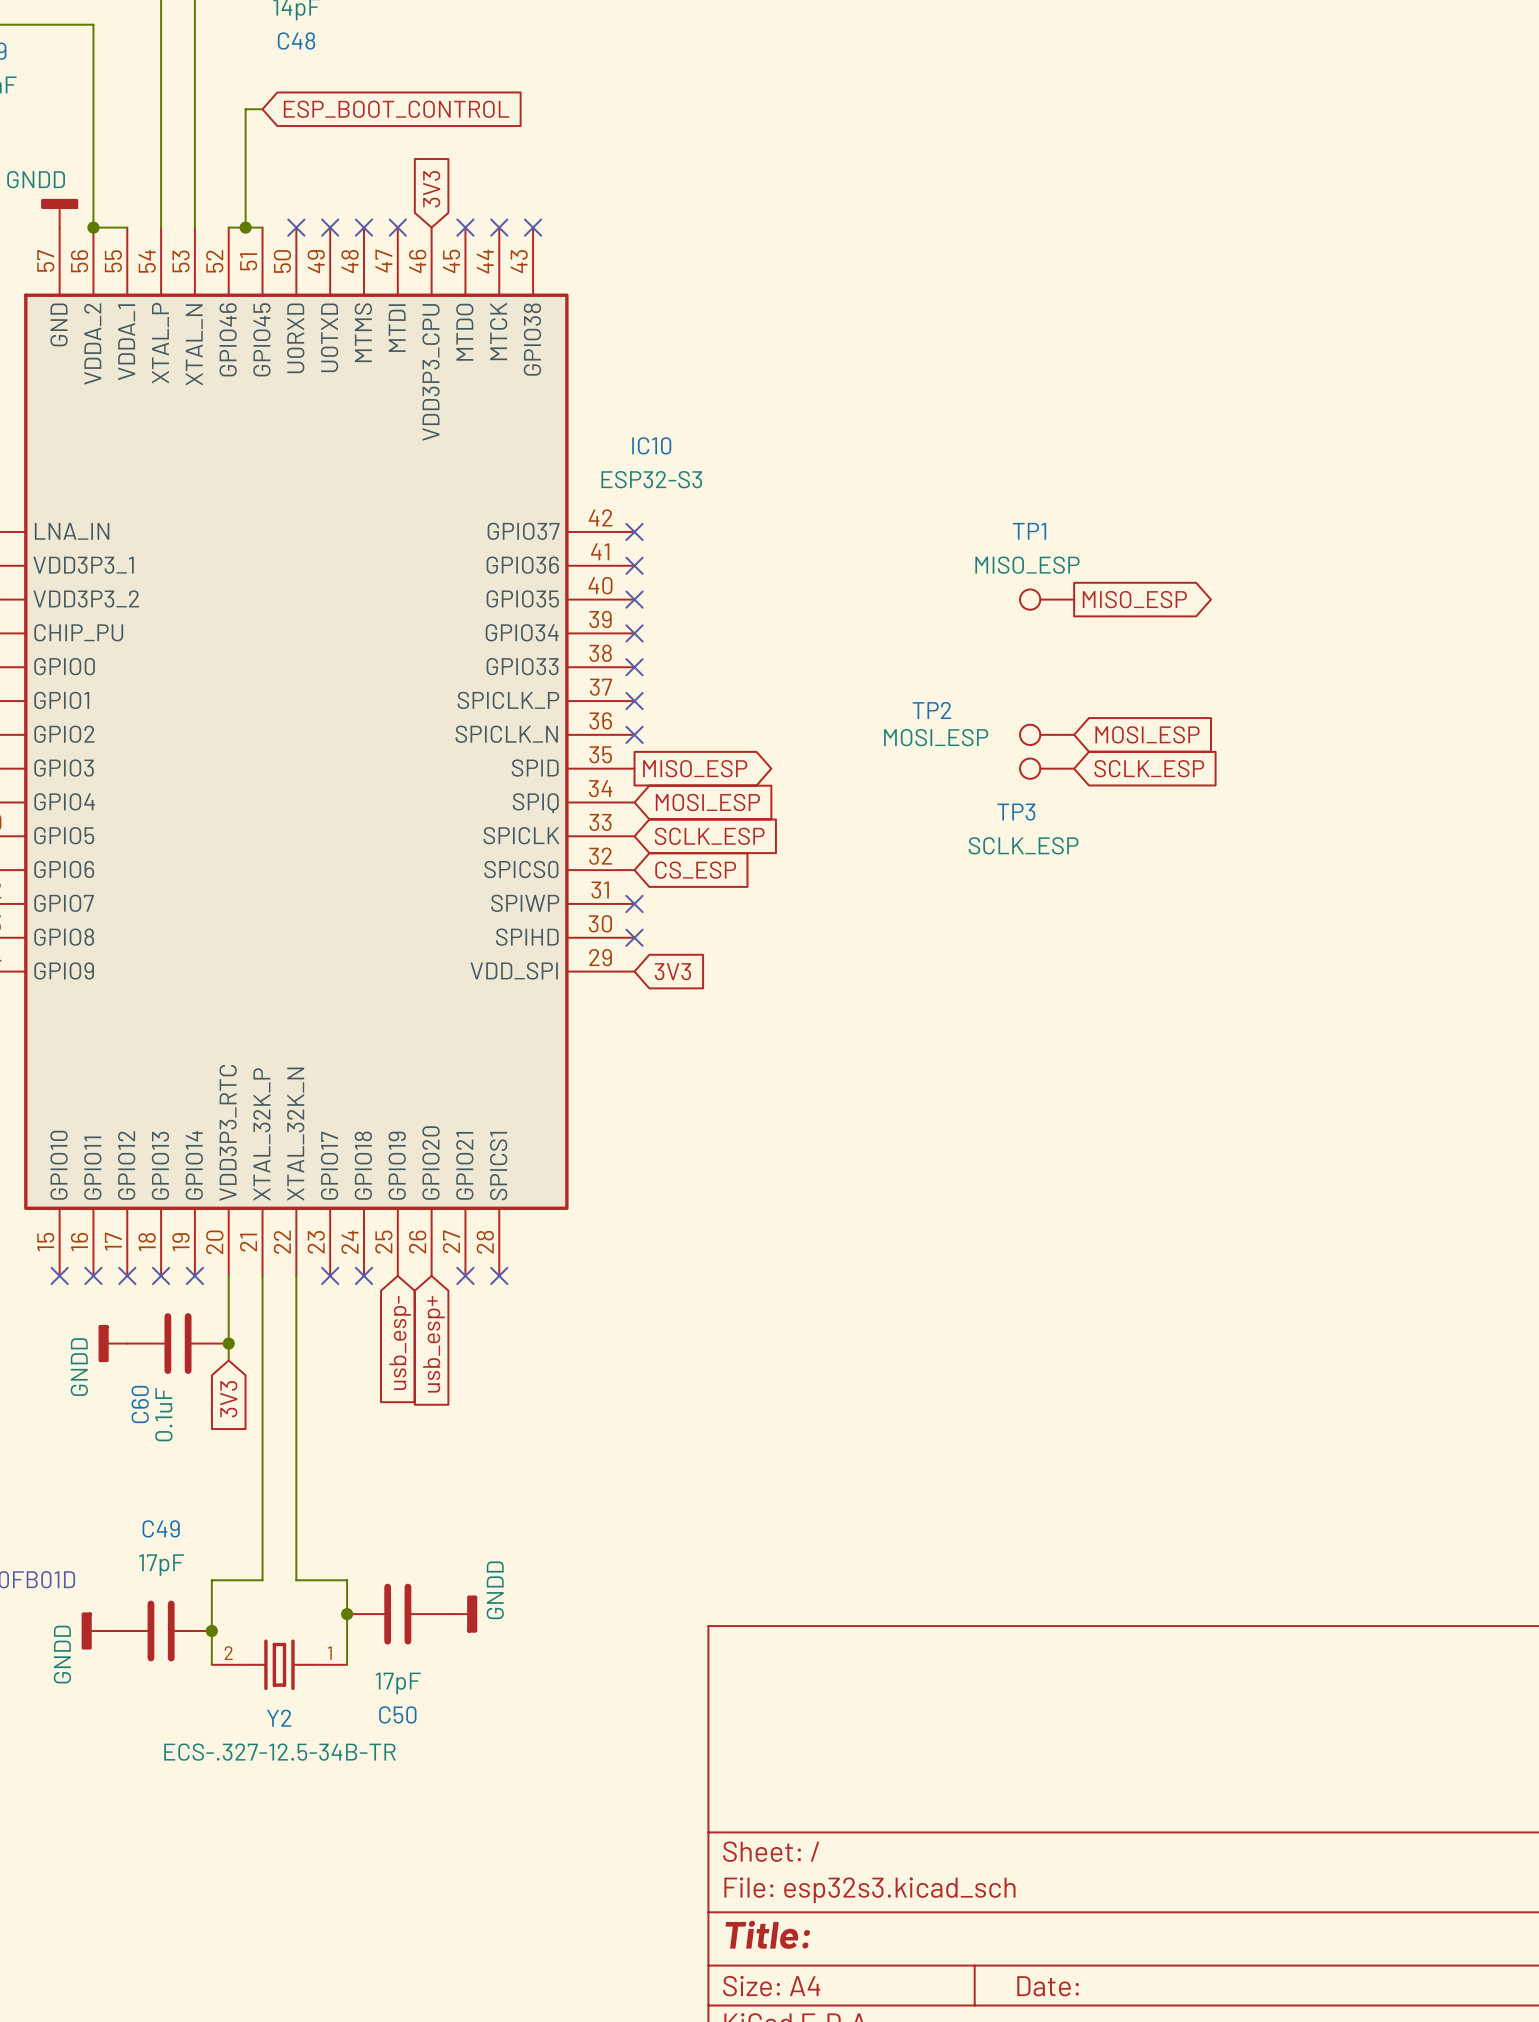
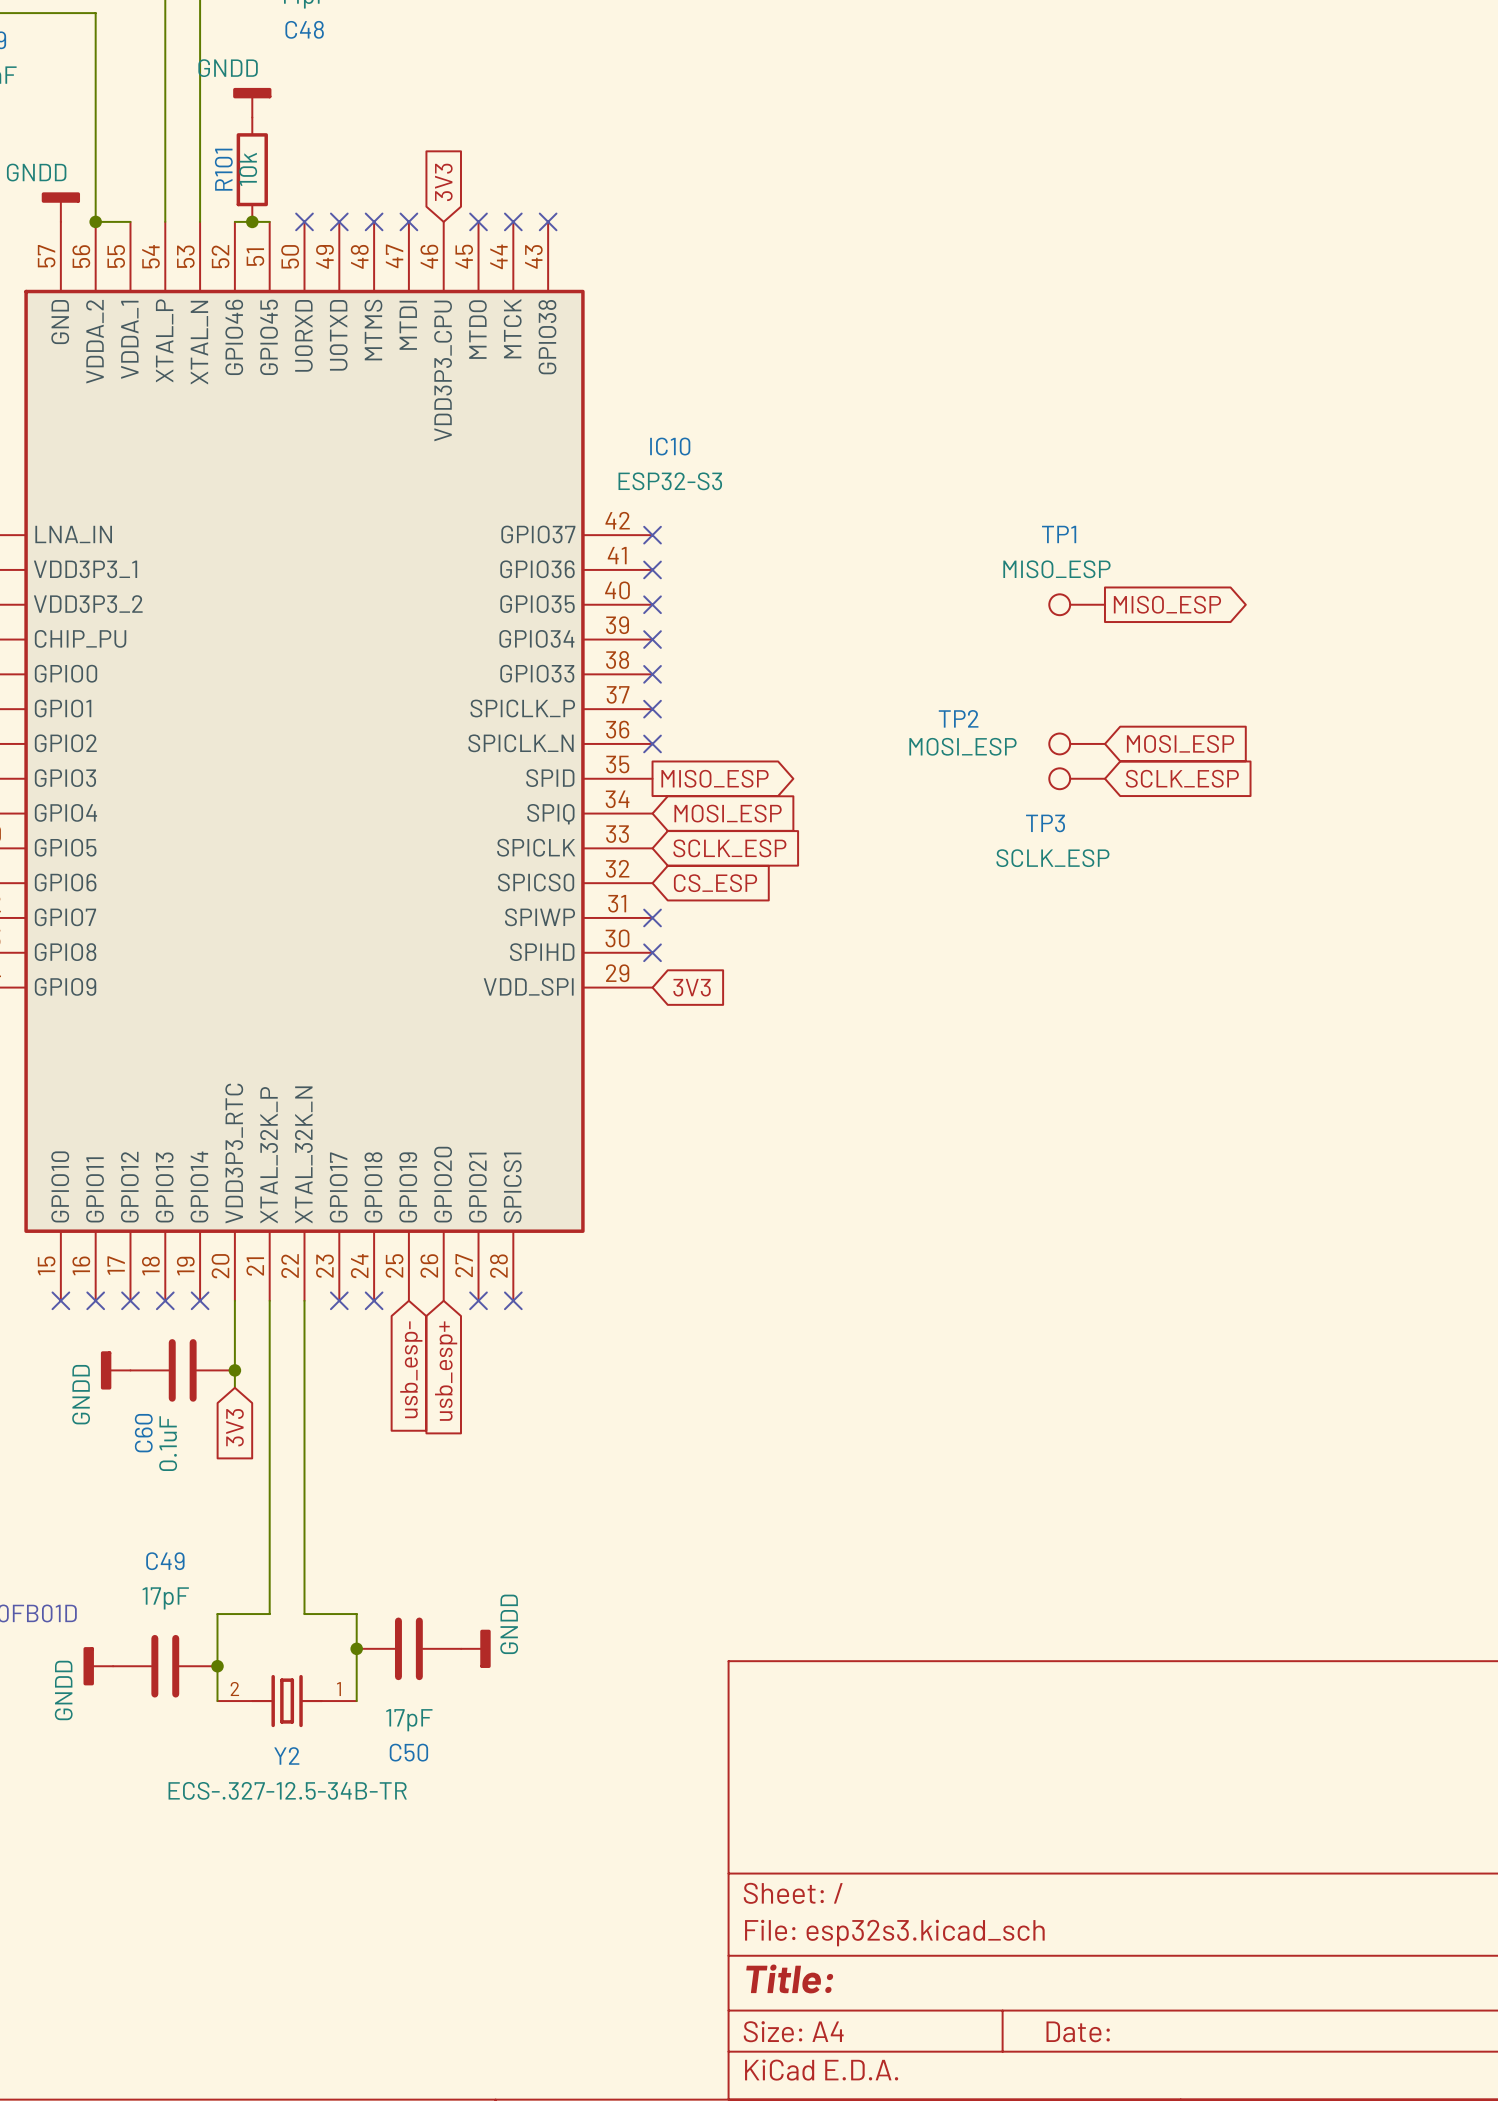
wire: (262, 109) (245, 109) (245, 227) -> none
global label: ESP_BOOT_CONTROL (396, 109) -> none
power symbol: none -> GNDD (252, 102)
R101: none -> 10k (252, 169)

